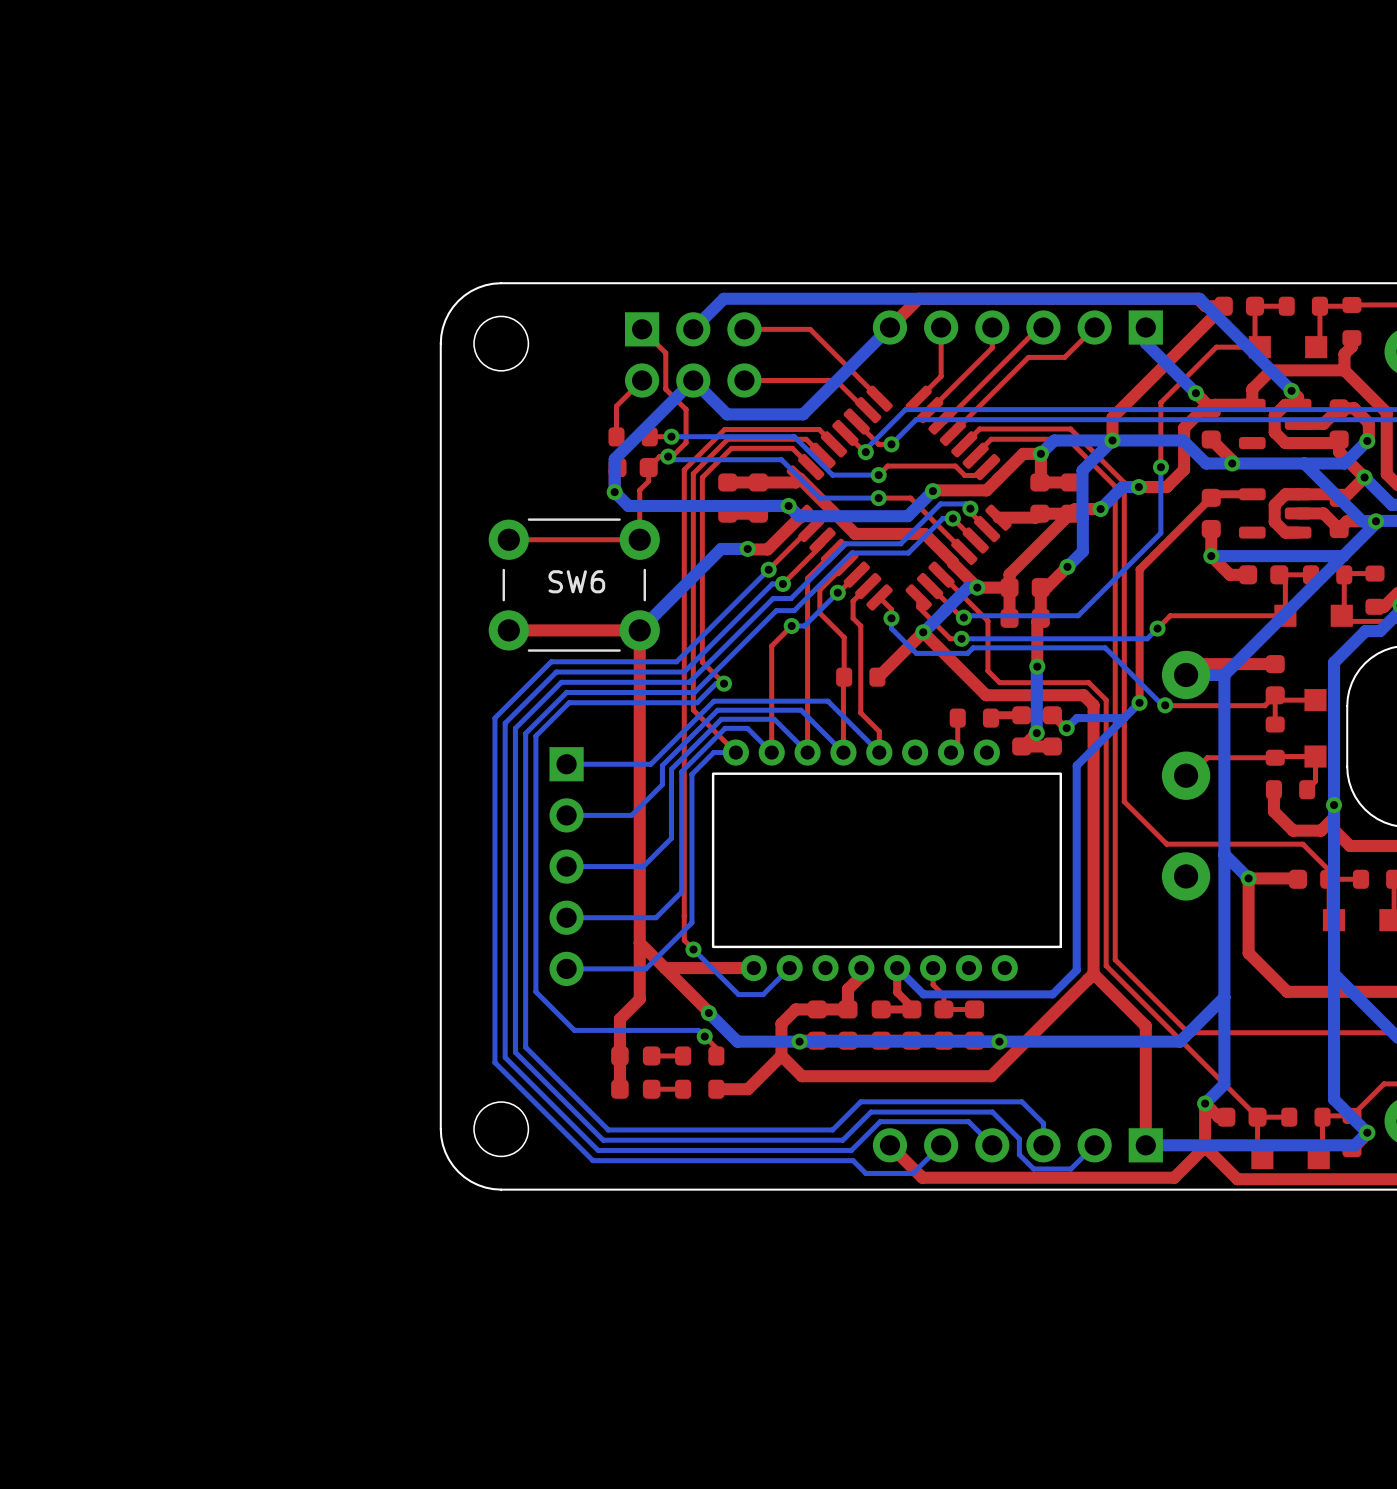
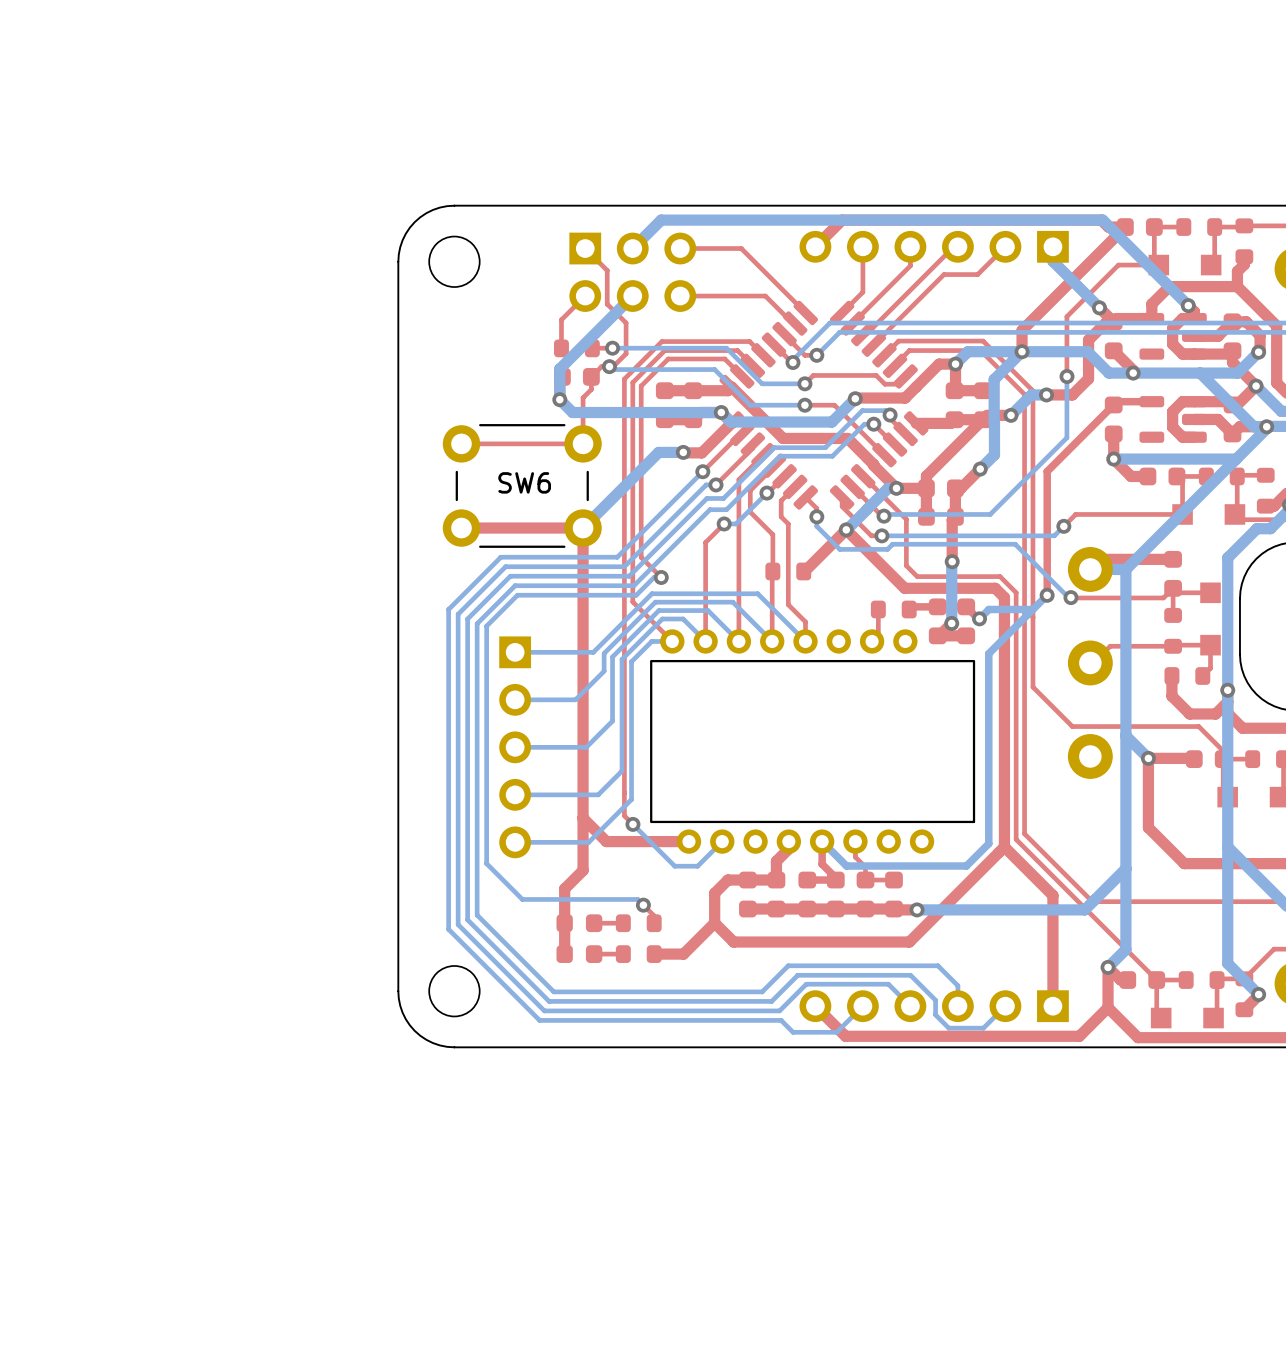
bottom track: (889, 327) (803, 414) (727, 414) (693, 380) -> none
top track: (664, 968) (708, 1013) -> none
bottom track: (708, 1013) (737, 1041) (999, 1041) -> none
via: (708, 1013) -> none
via: (799, 1041) -> none
bottom track: (1367, 1132) (1354, 1145) (1145, 1145) -> none

